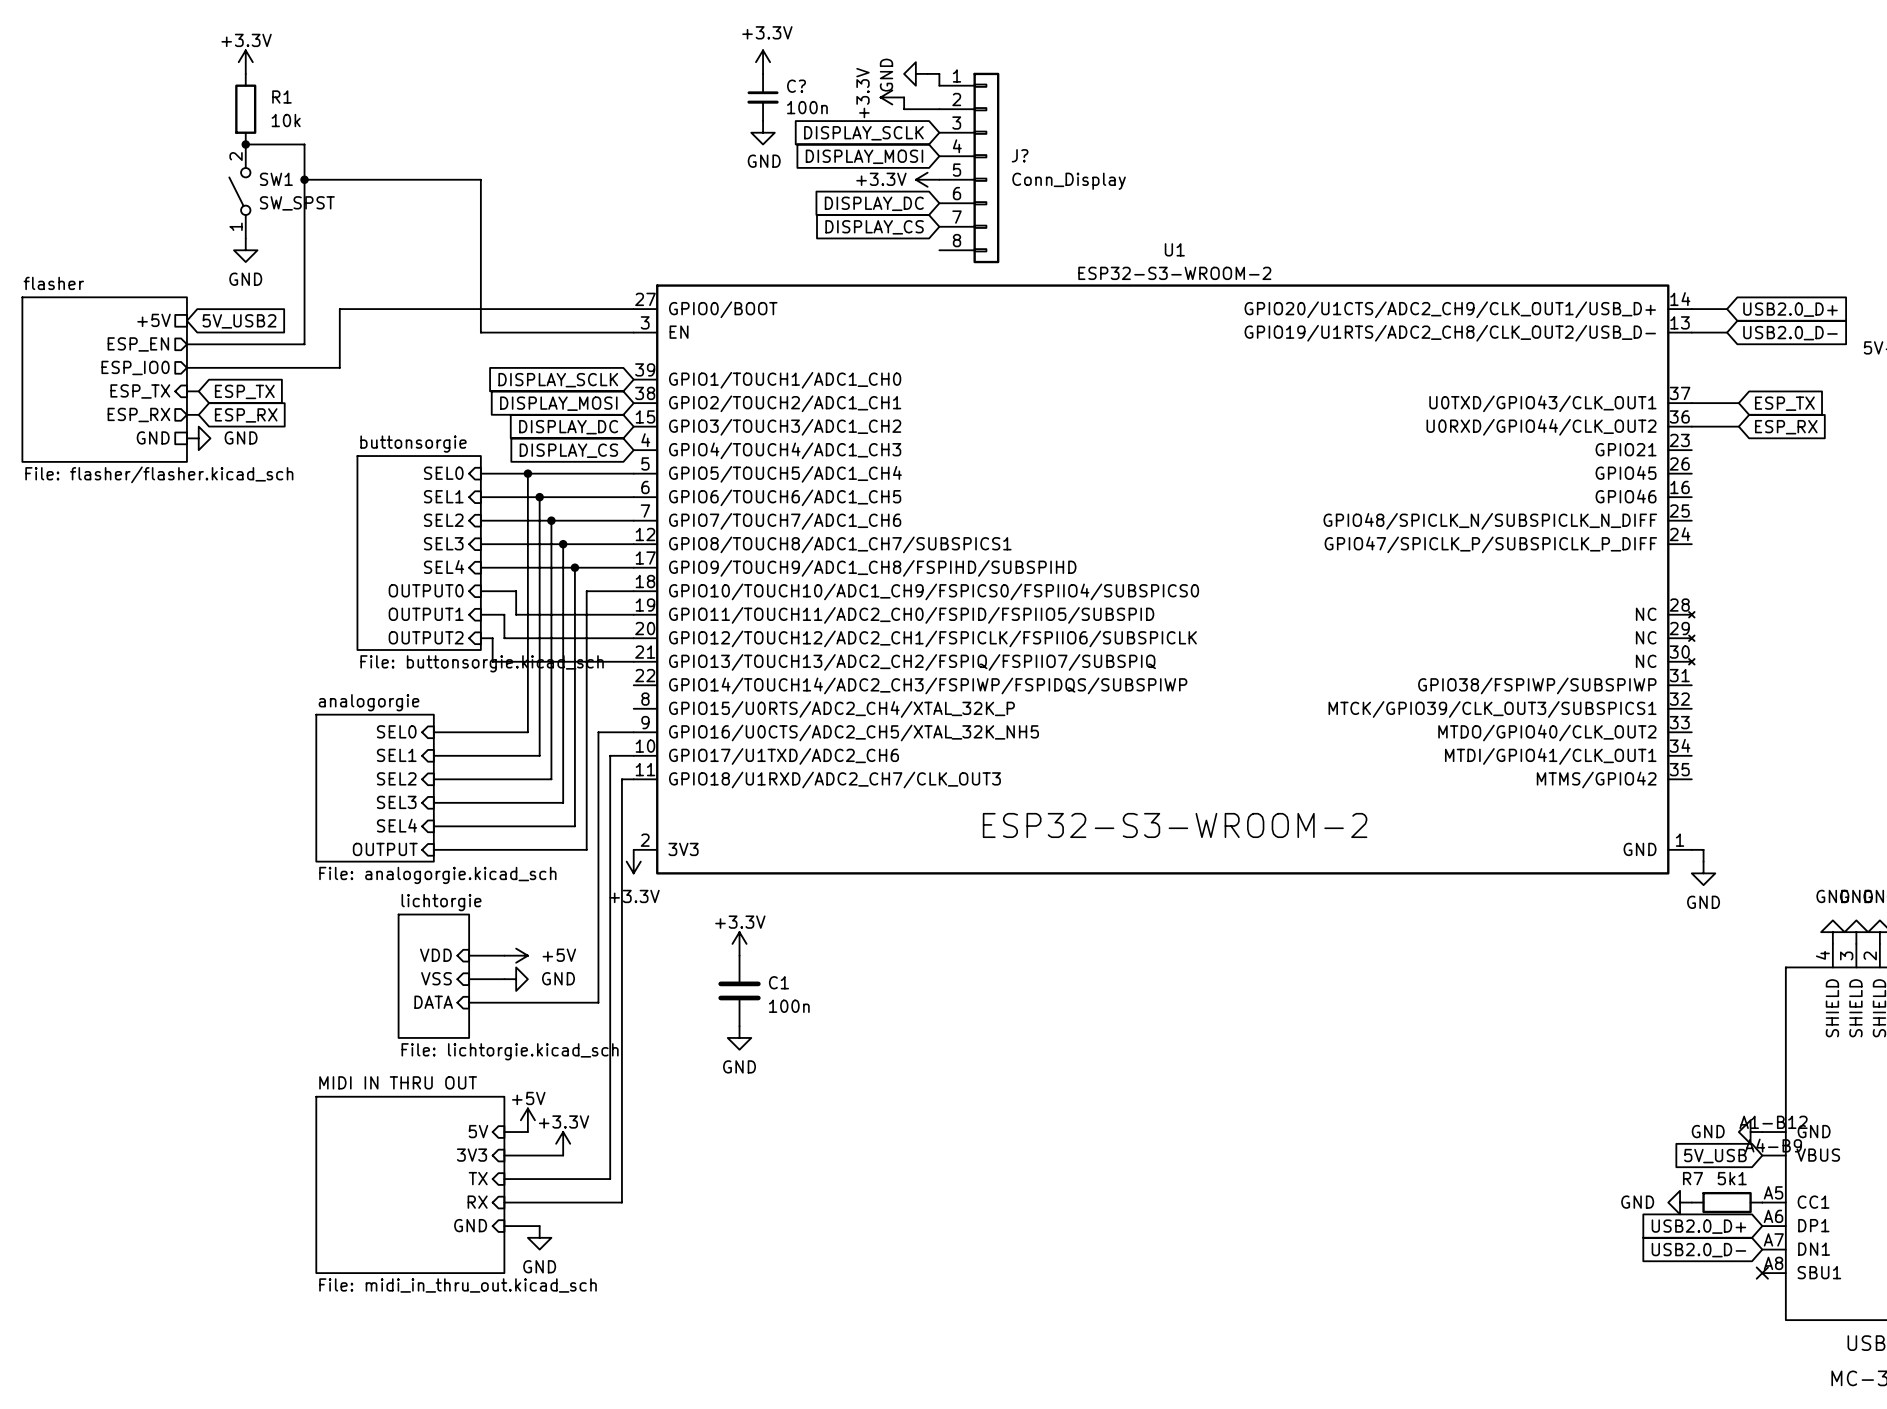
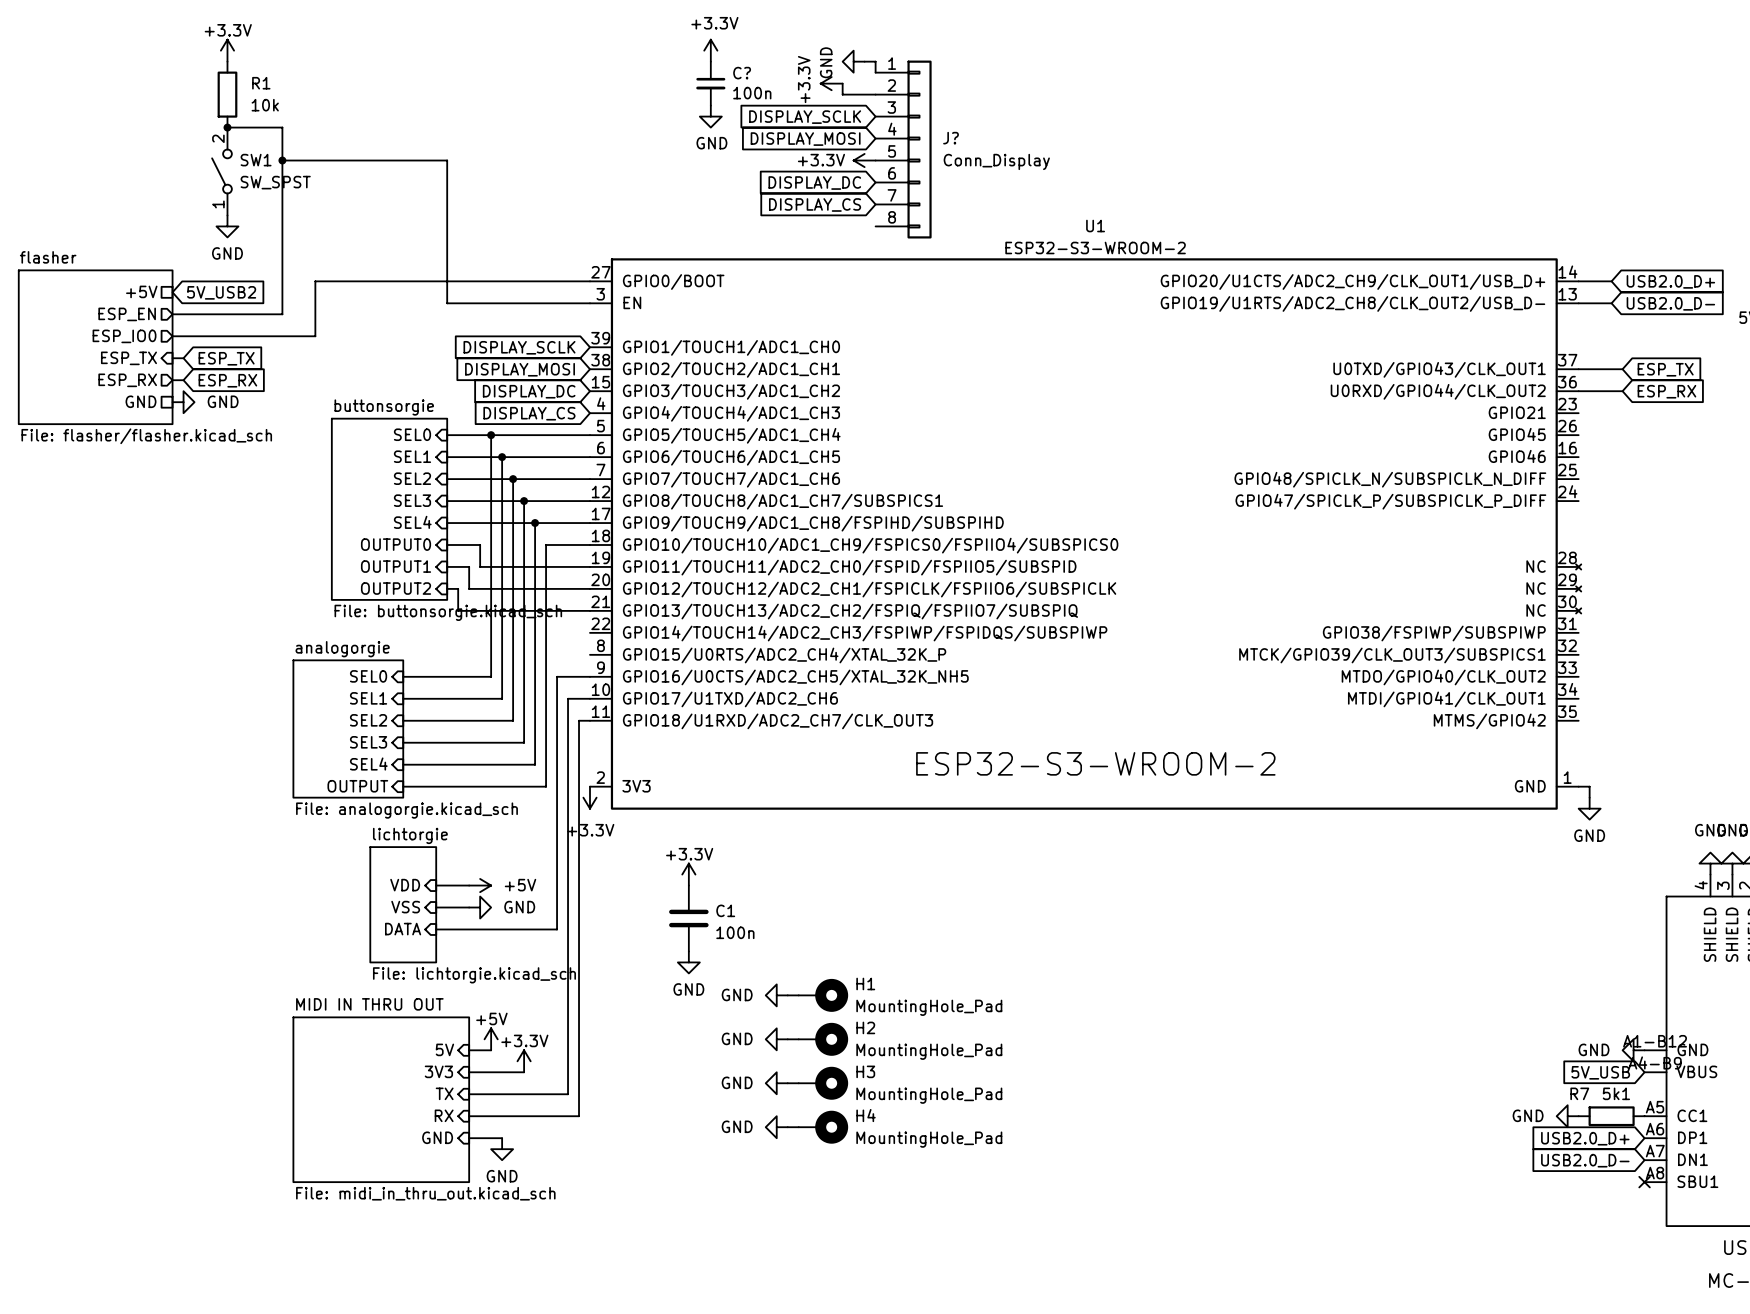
power symbol: none -> GND (776, 995)
wire: none -> (787, 995) (798, 995)
H1: none -> MountingHole_Pad (823, 995)
power symbol: none -> GND (776, 1039)
wire: none -> (787, 1039) (798, 1039)
H2: none -> MountingHole_Pad (823, 1039)
power symbol: none -> GND (776, 1083)
wire: none -> (787, 1083) (798, 1083)
H3: none -> MountingHole_Pad (823, 1083)
power symbol: none -> GND (776, 1127)
wire: none -> (787, 1127) (798, 1127)
H4: none -> MountingHole_Pad (823, 1127)

